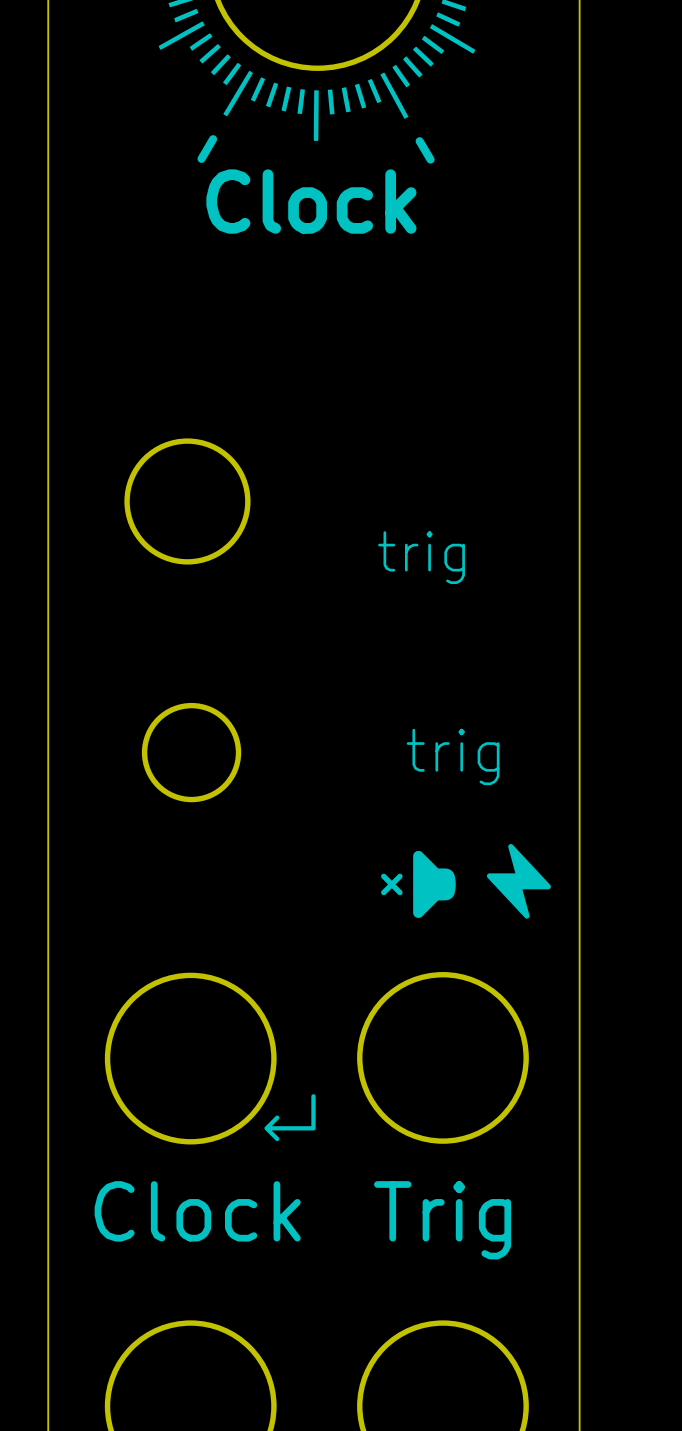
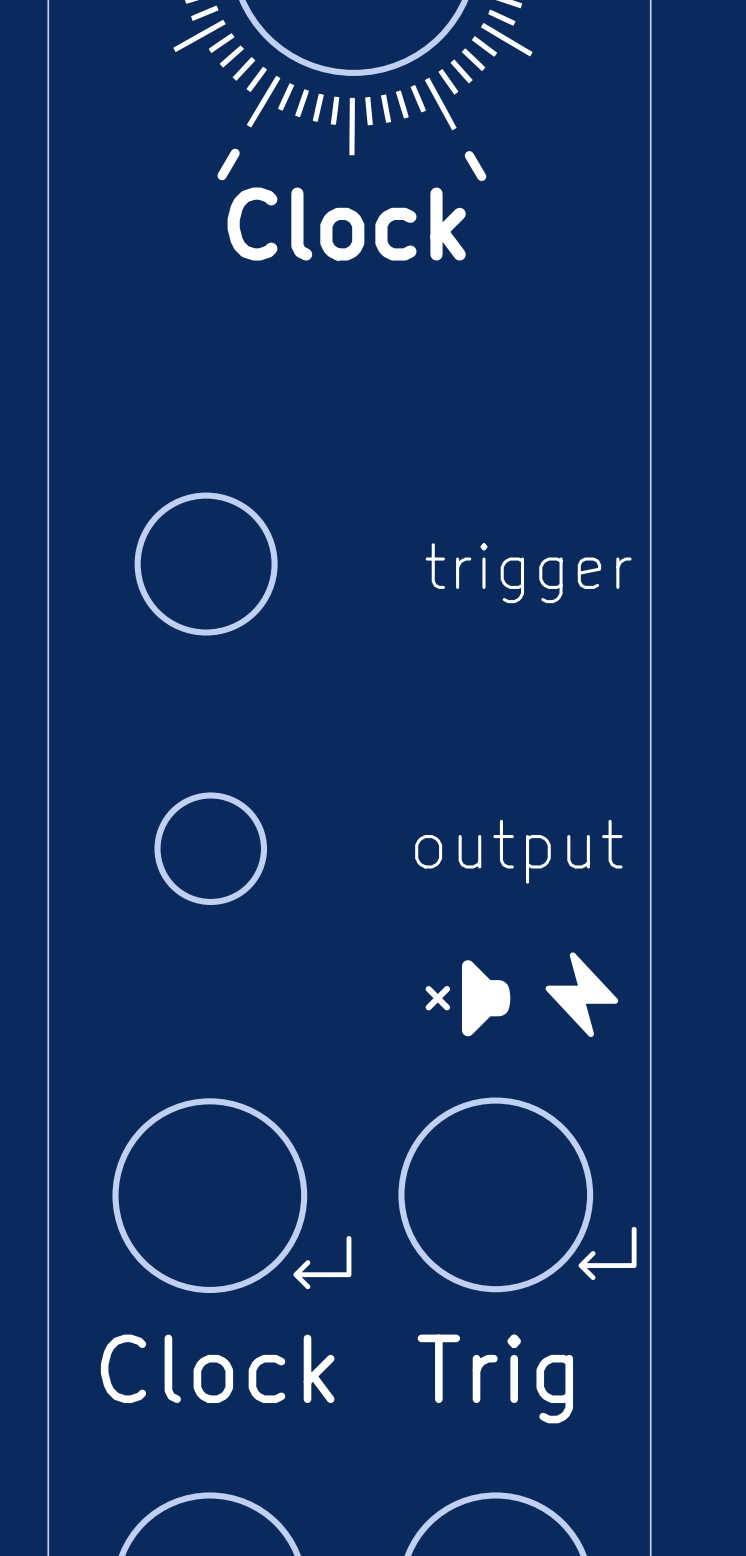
text: trig (421, 557) -> trigger (528, 573)
text: trig (453, 756) -> output (518, 851)
drawing: none -> [578, 1226, 637, 1280]

